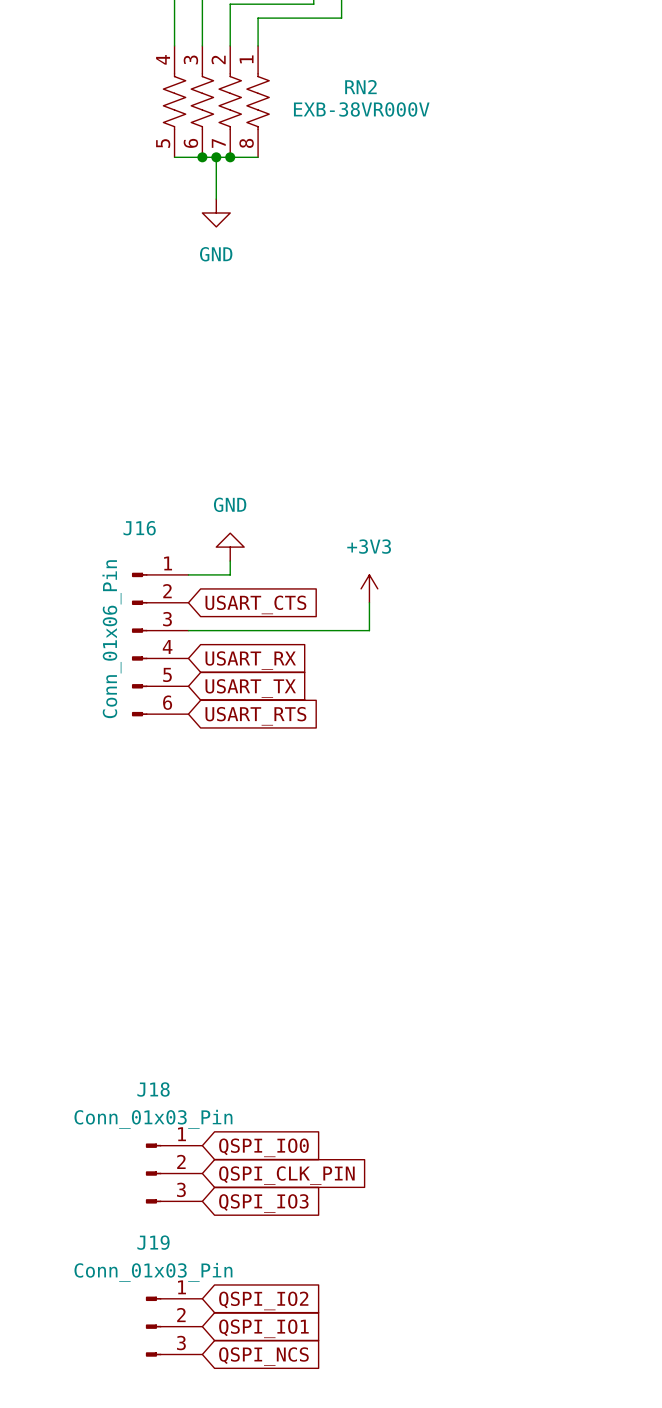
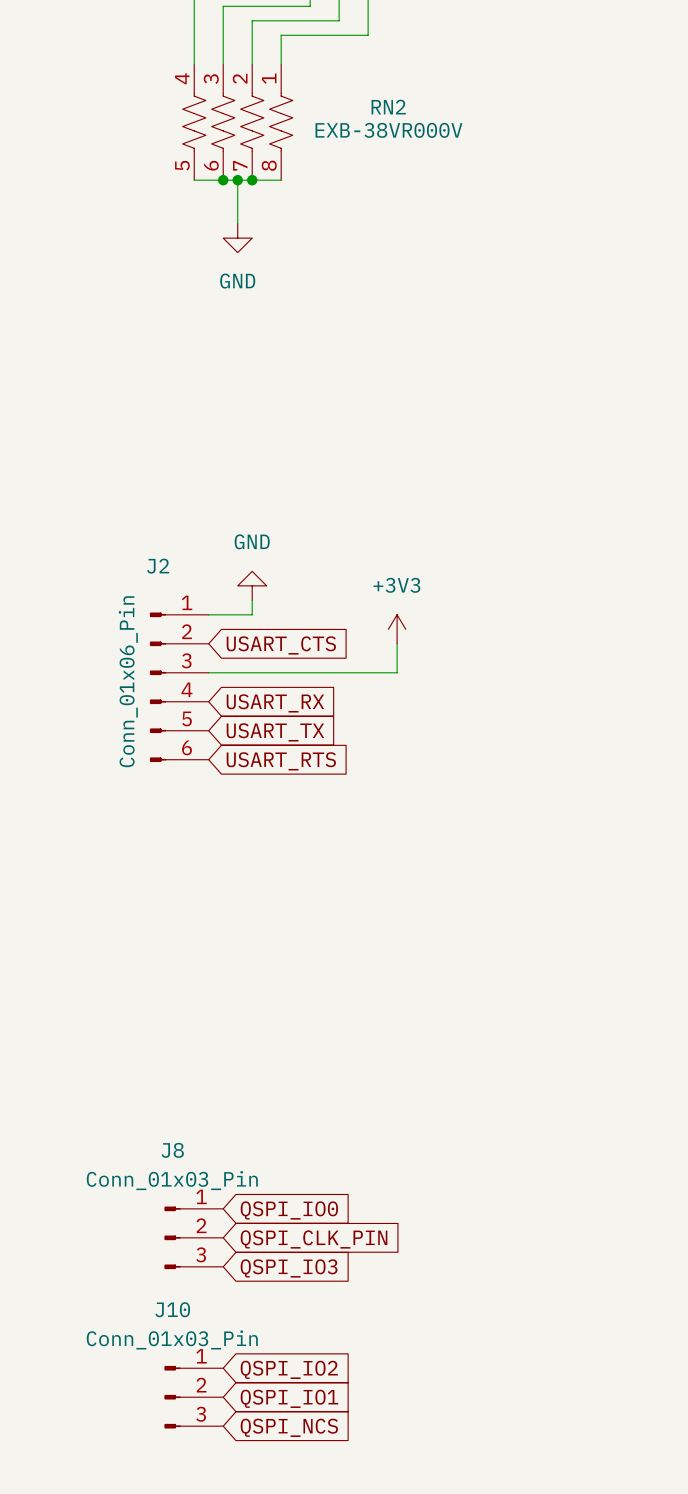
J16 name: J16 (139, 528) -> J2 (158, 566)
J18 name: J18 (153, 1089) -> J8 (172, 1150)
J19 name: J19 (153, 1242) -> J10 (172, 1309)

